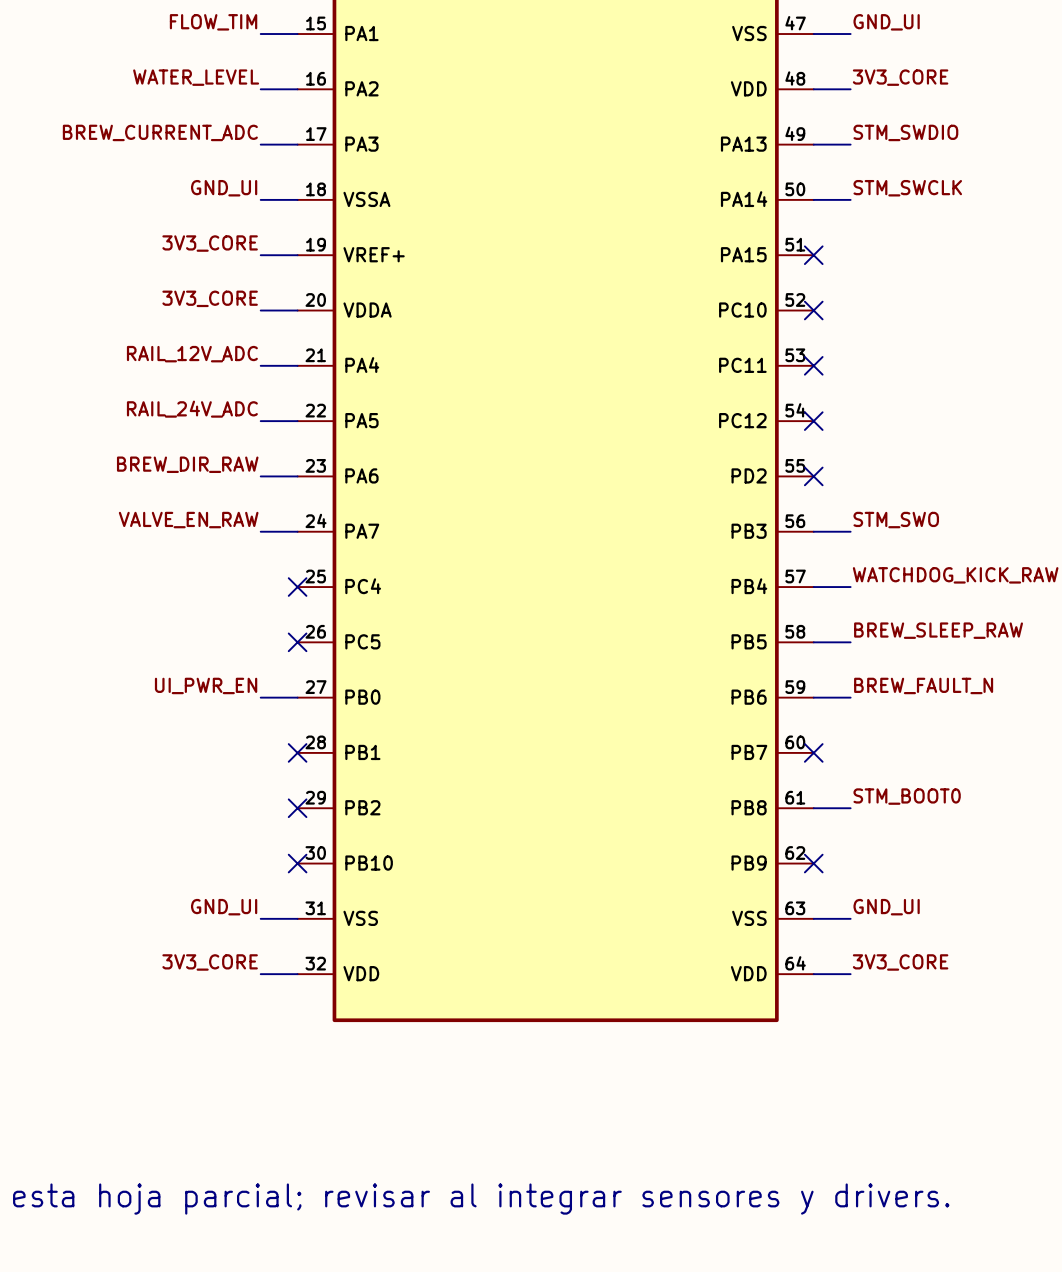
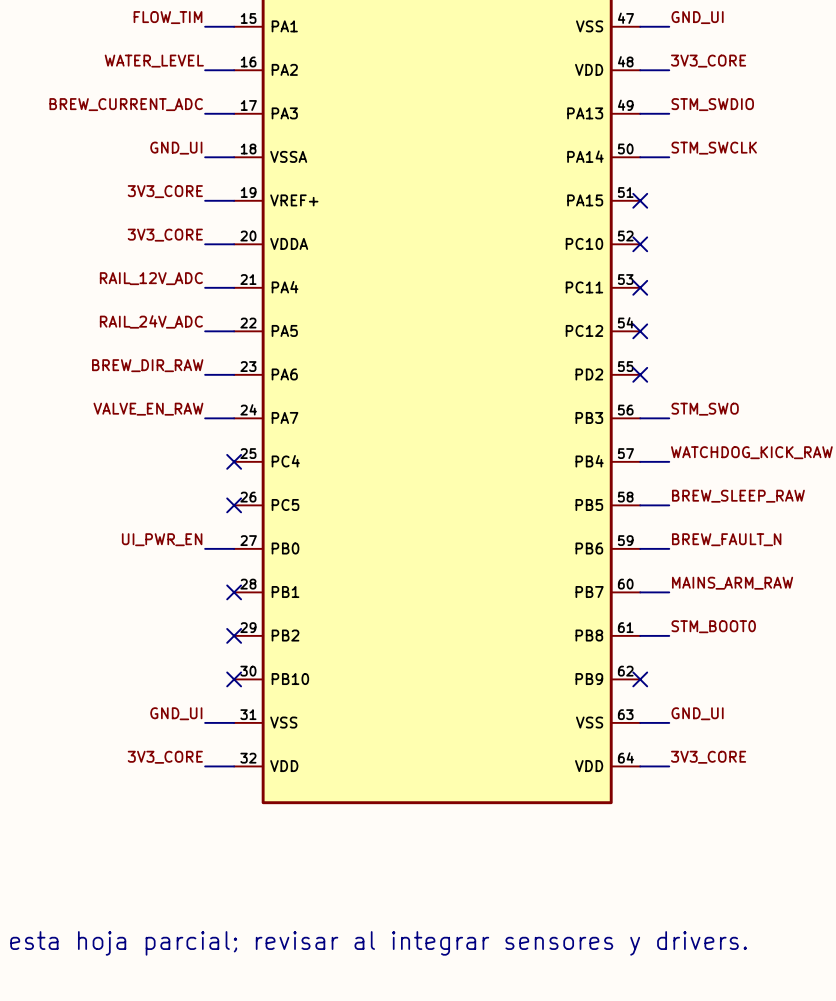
label: none -> MAINS_ARM_RAW (732, 583)
wire: none -> (640, 592) (669, 592)
no-connect mark: (813, 752) -> none

